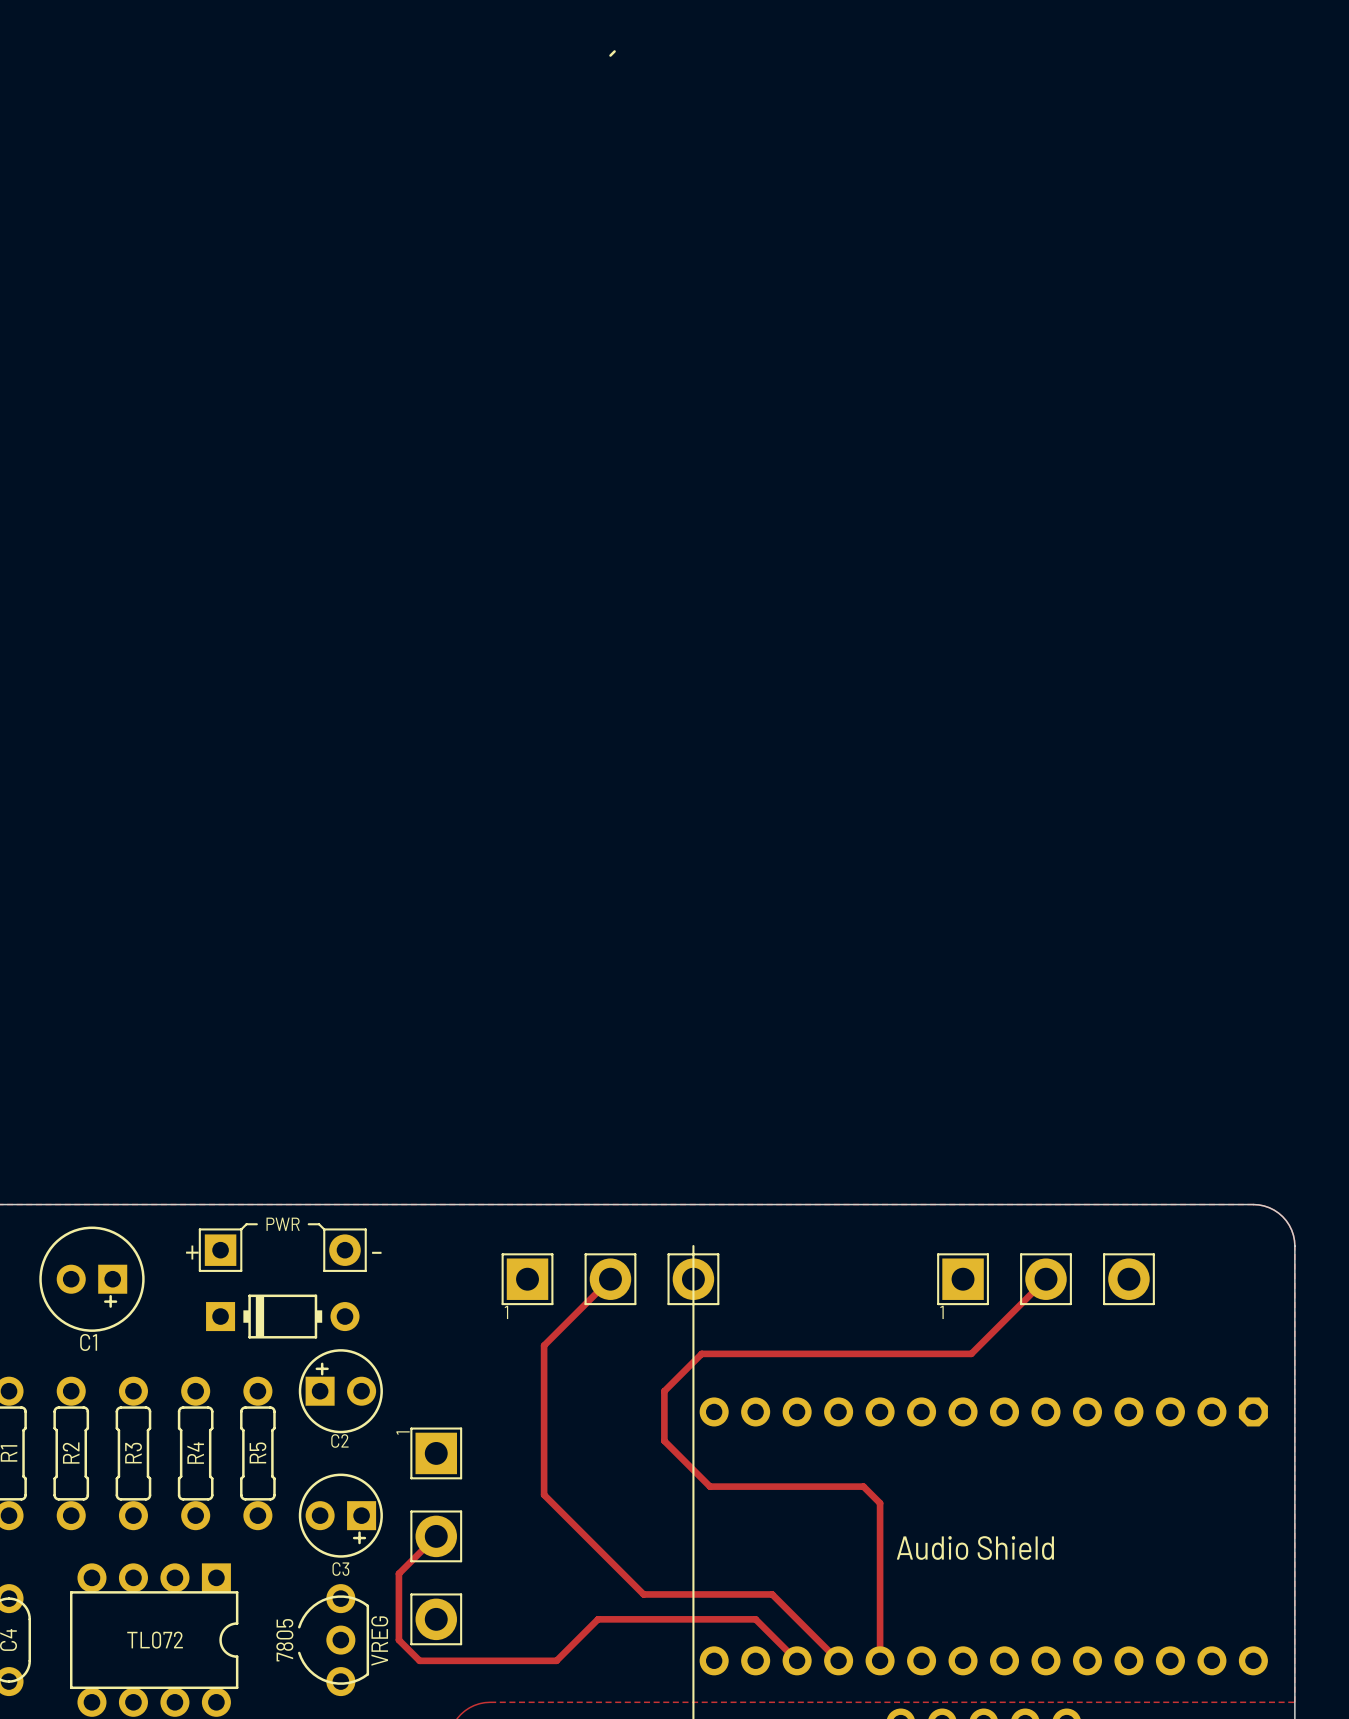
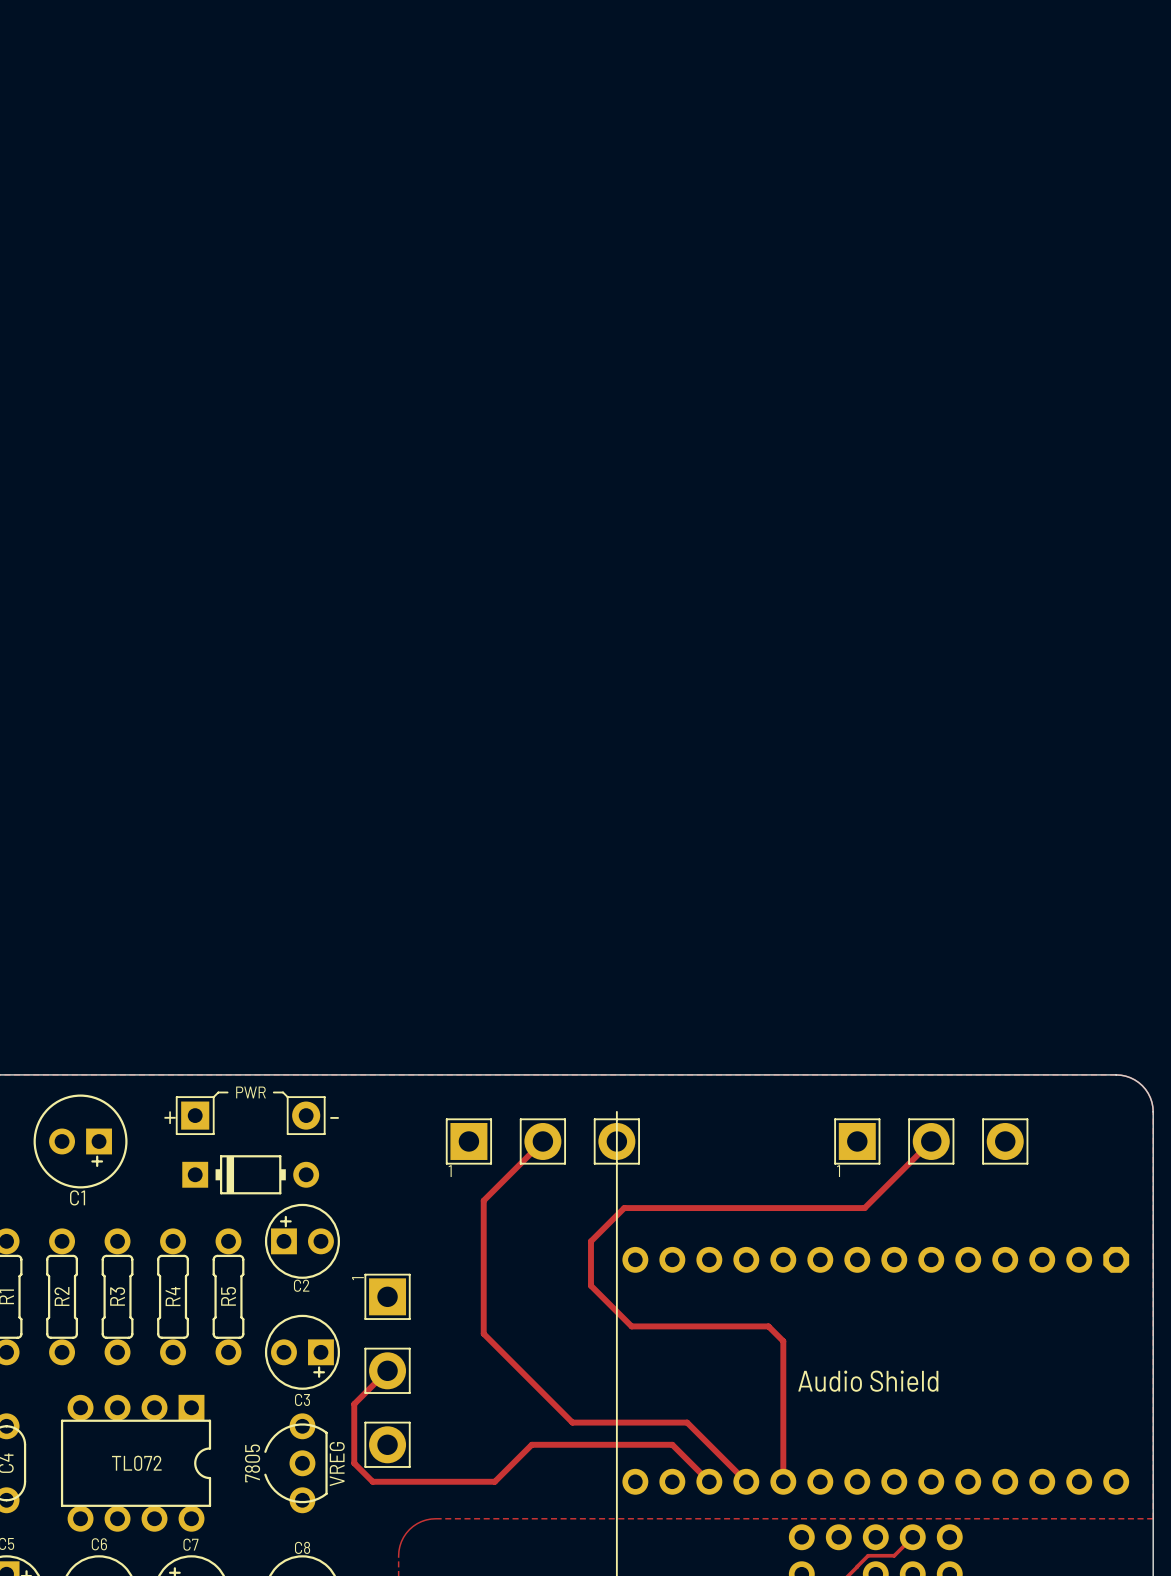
line: (614, 51) (610, 55) -> none

